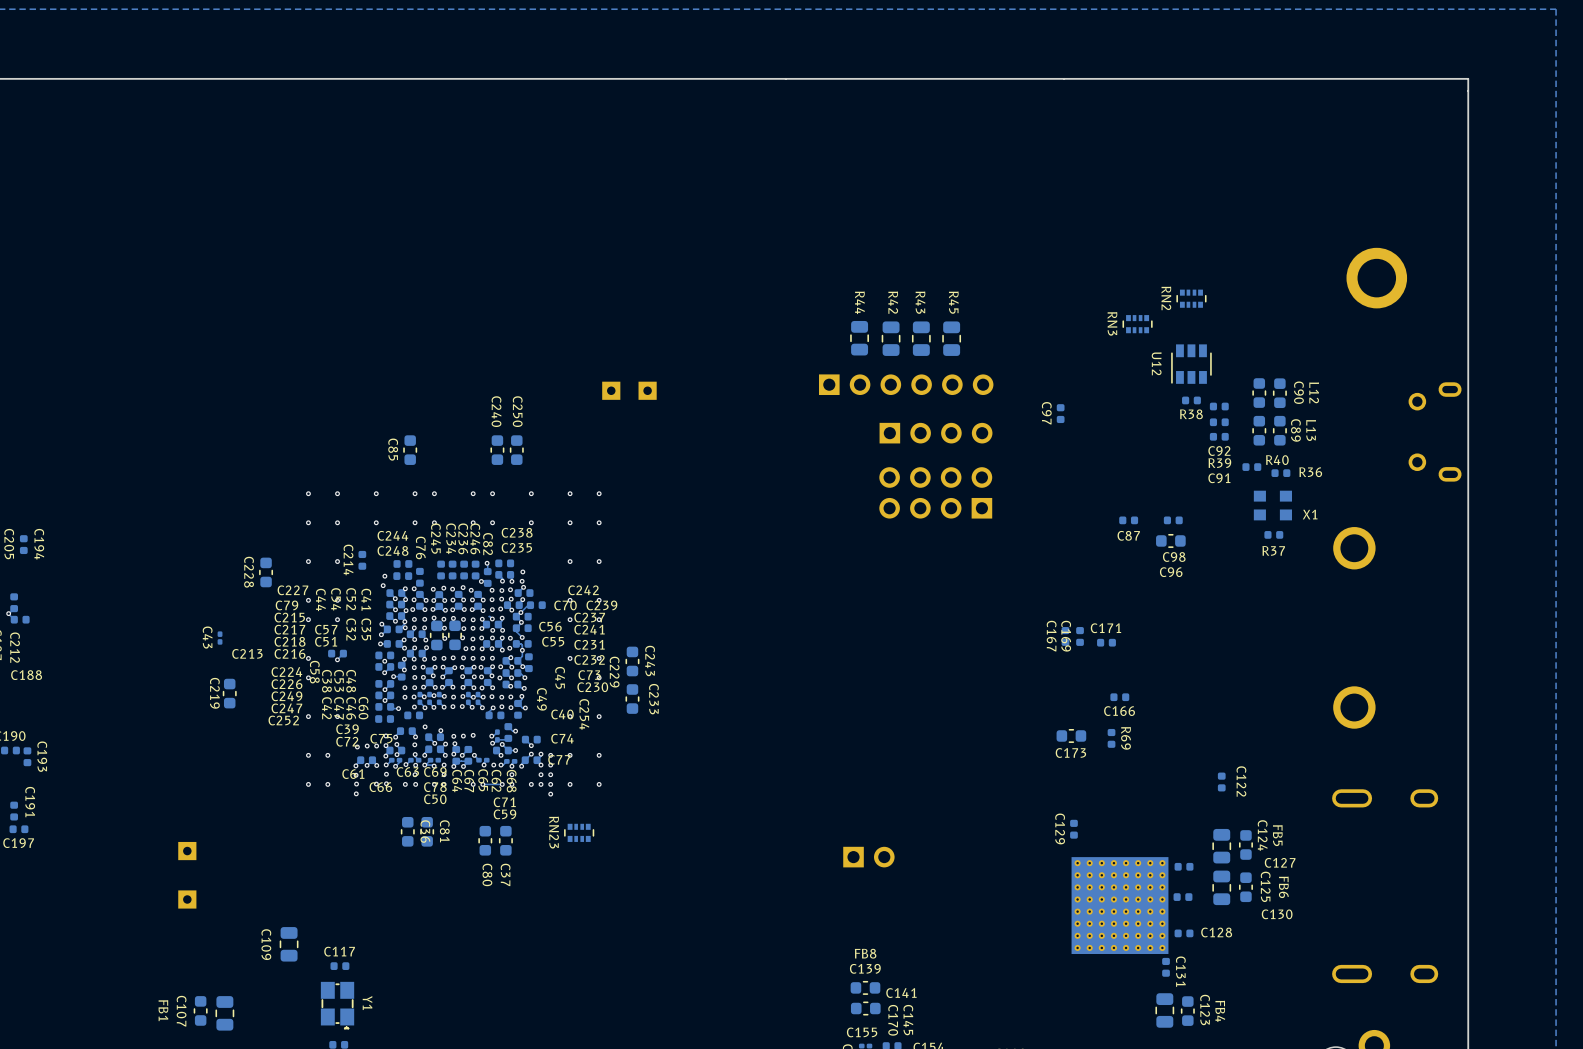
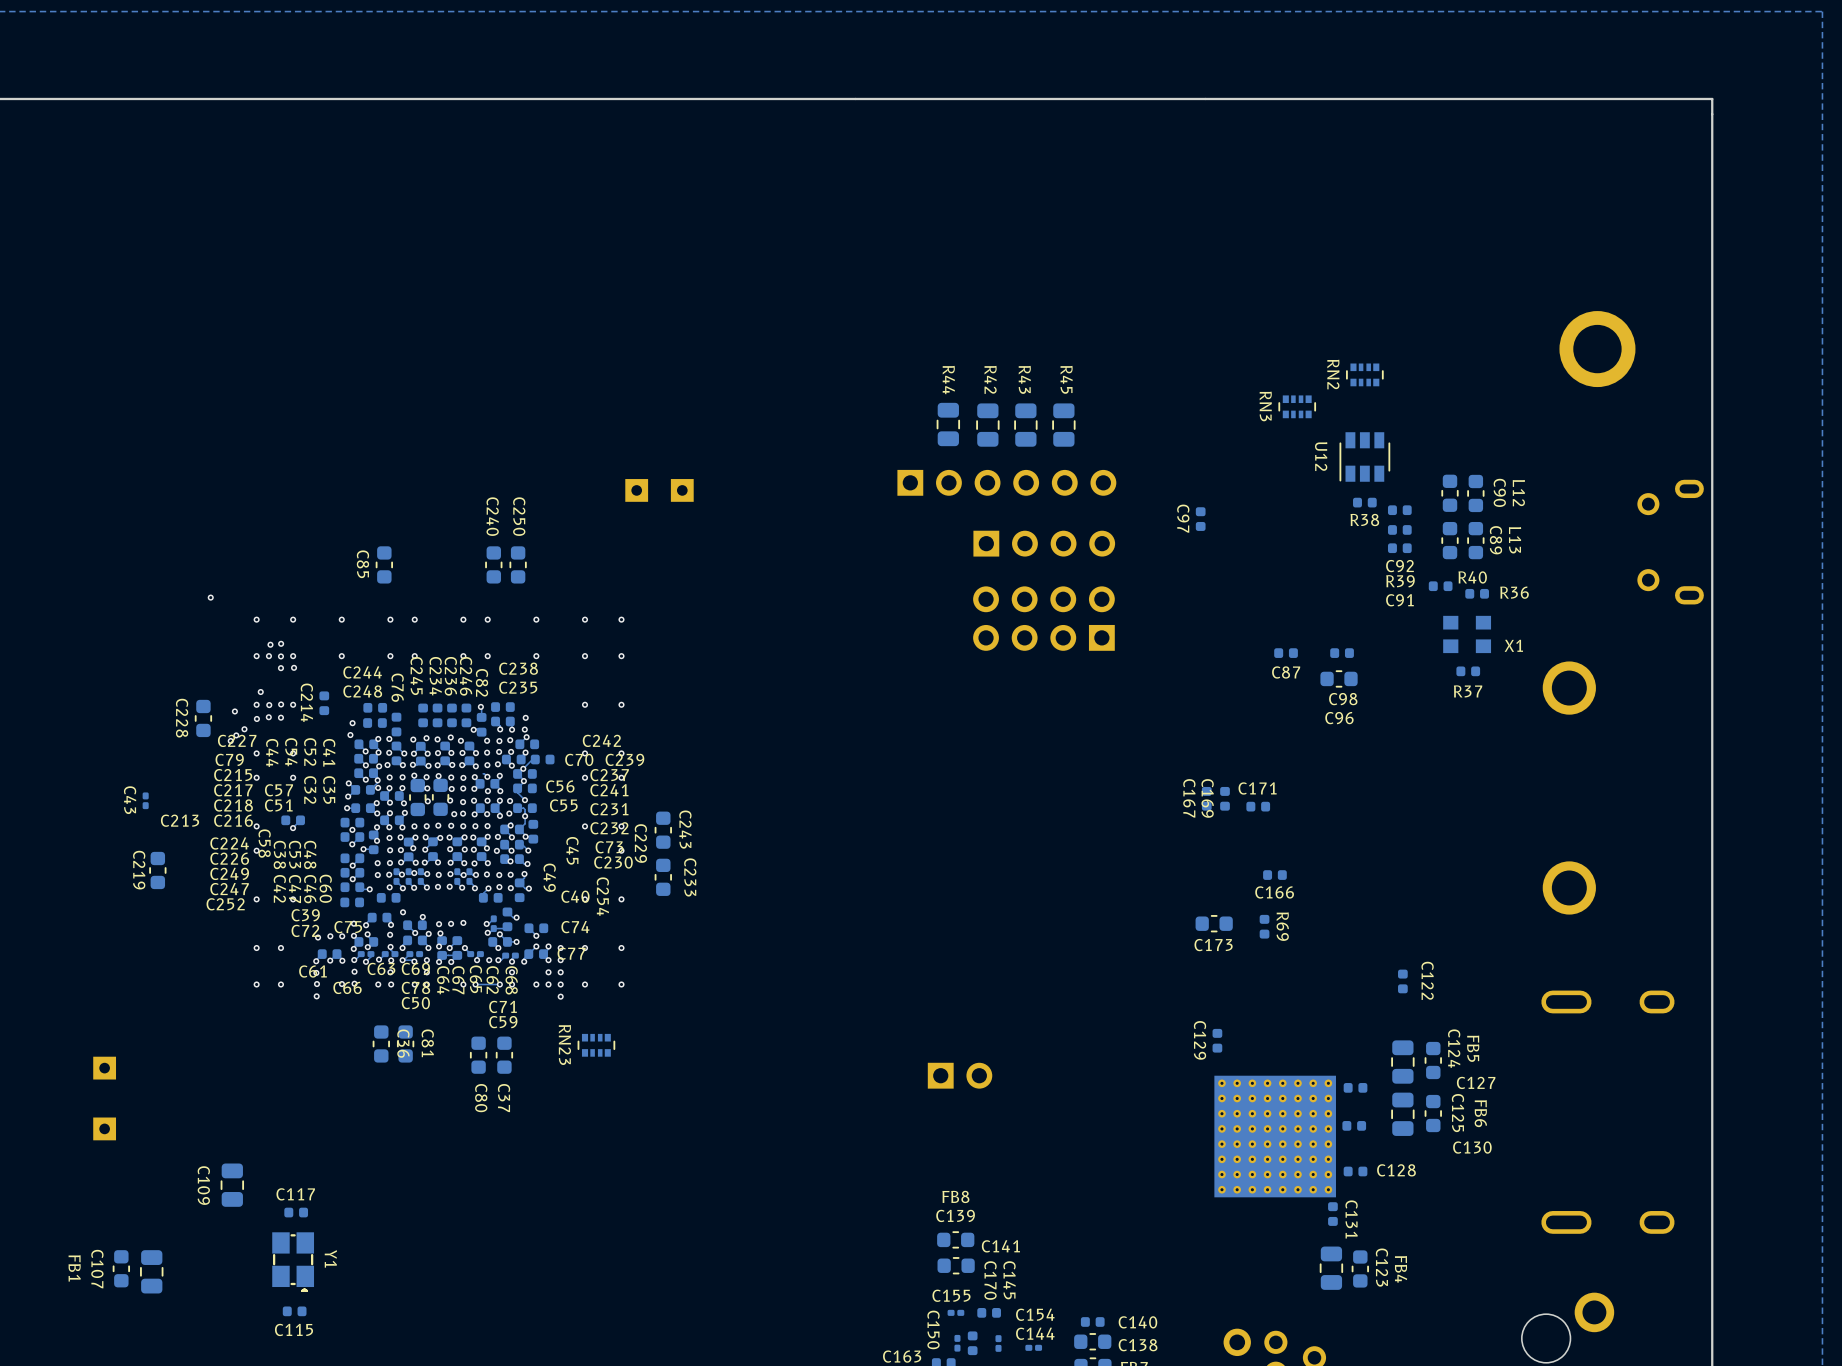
via: none -> (210, 597)
via: none -> (281, 643)
via: none -> (270, 644)
via: none -> (268, 656)
via: none -> (280, 656)
via: none -> (280, 668)
via: none -> (294, 667)
via: none -> (260, 692)
via: none -> (269, 705)
via: none -> (281, 704)
via: none -> (234, 711)
via: none -> (268, 717)
via: none -> (280, 717)
via: none -> (256, 718)
via: none -> (244, 729)
via: none -> (236, 735)
via: none -> (230, 741)

